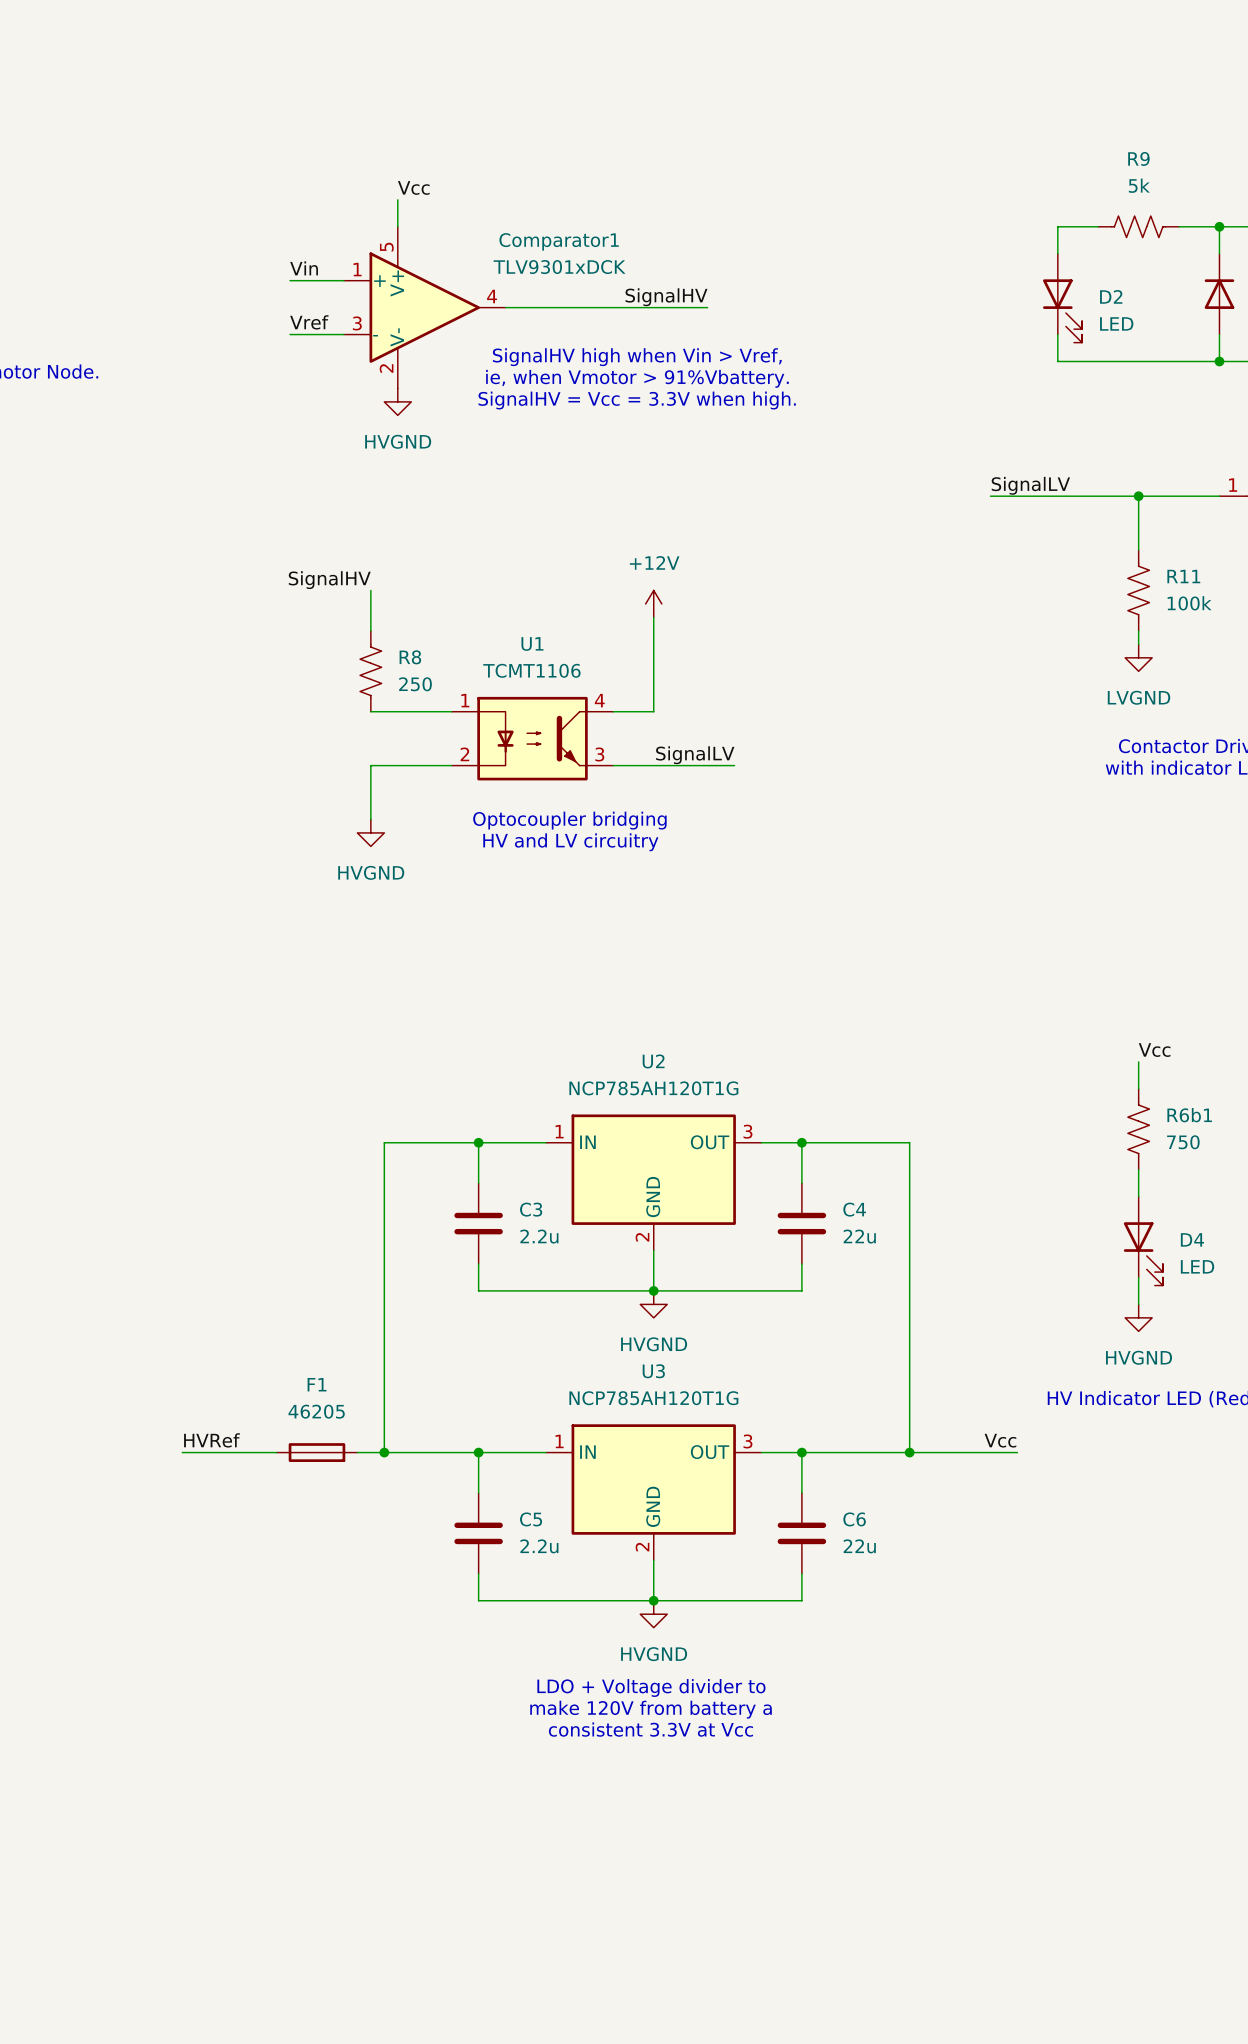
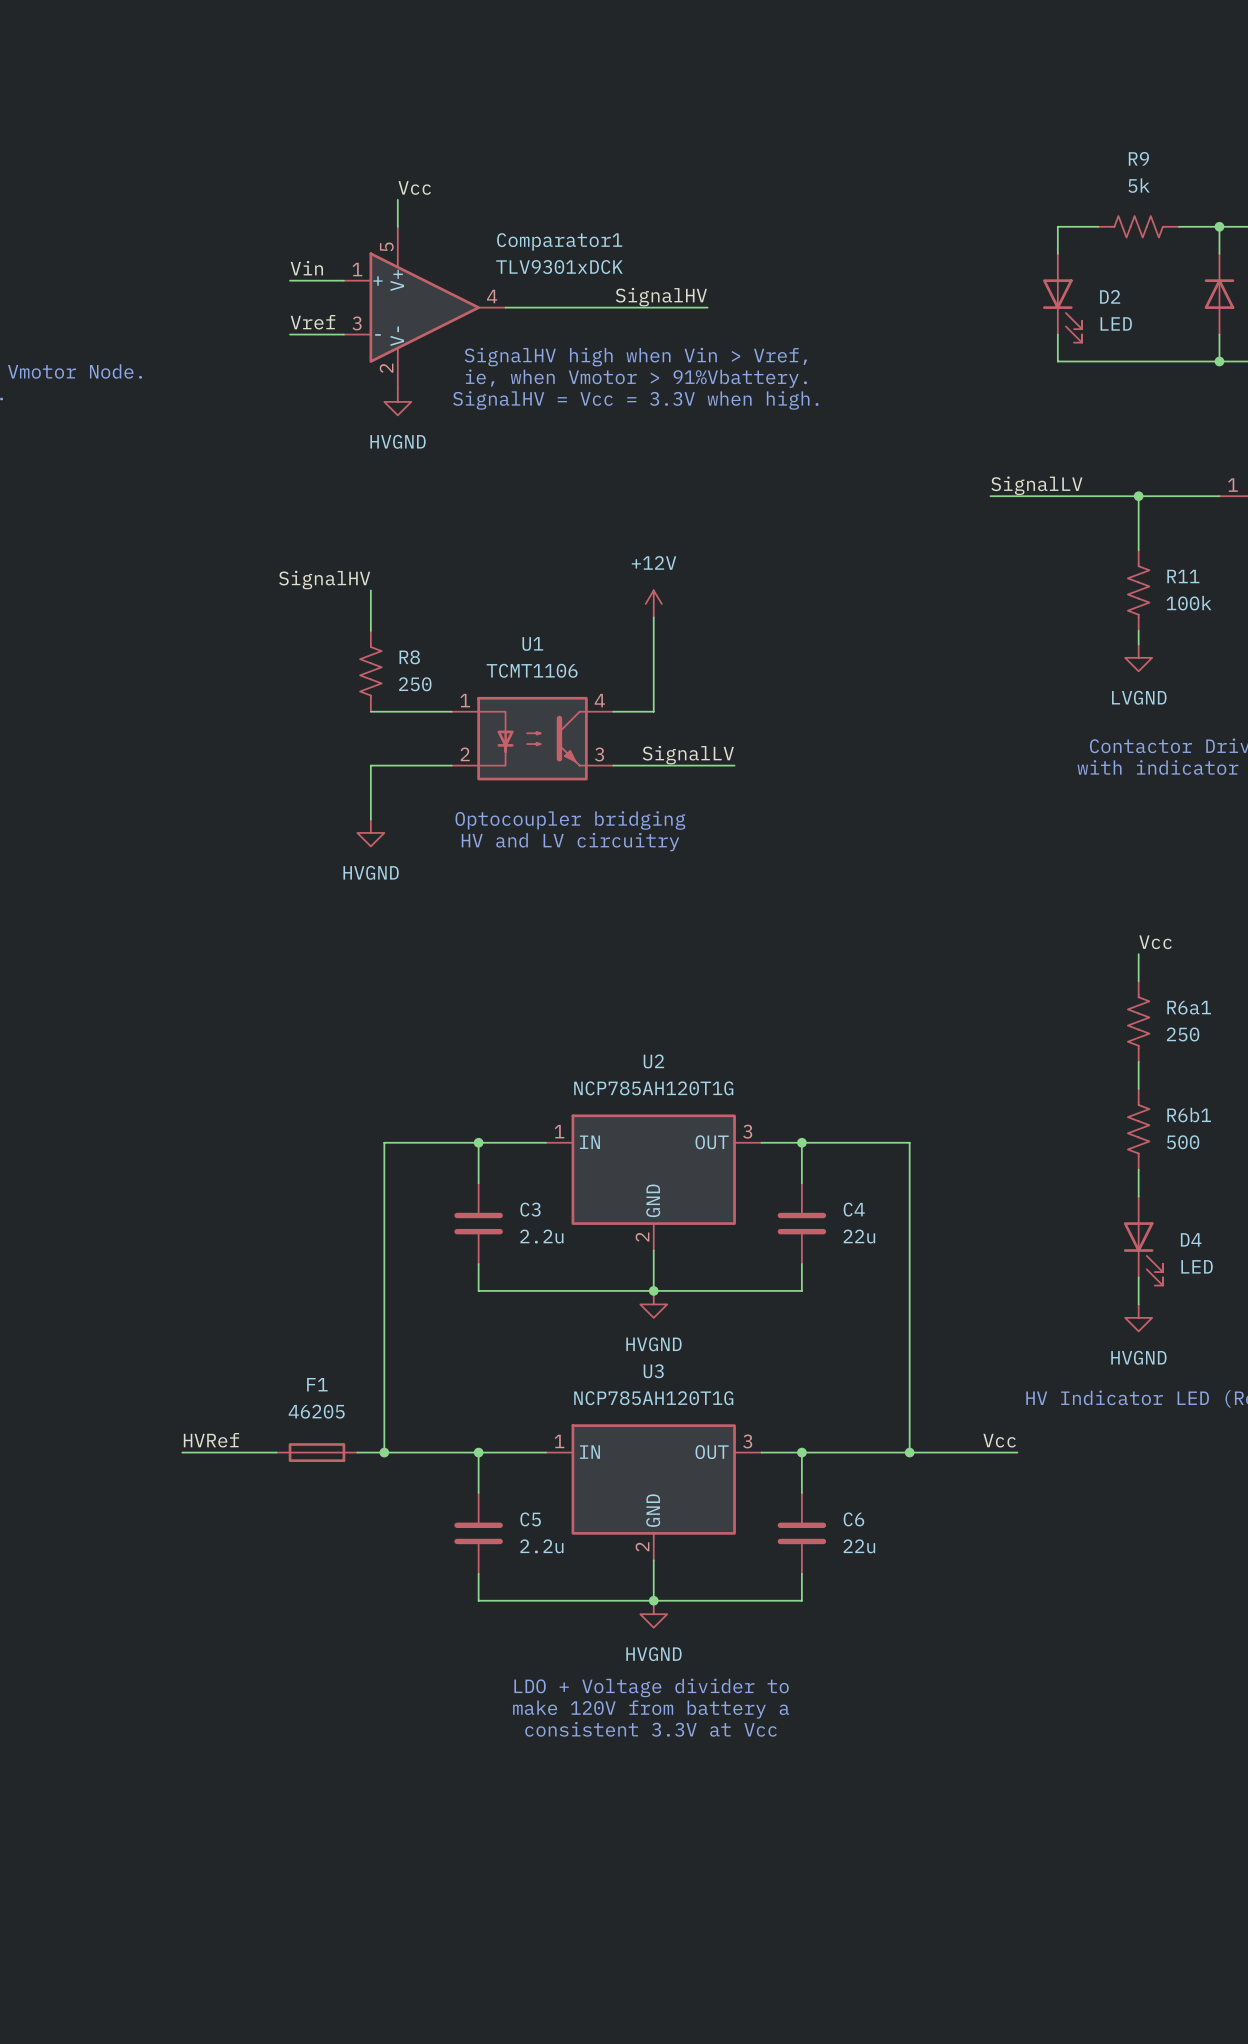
wire: none -> (1138, 954) (1138, 981)
R6a1: none -> 250 (1138, 1021)
label position: Vcc (1154, 1050) -> Vcc (1155, 942)
R6b1 value: 750 (1183, 1142) -> 500 (1183, 1142)

